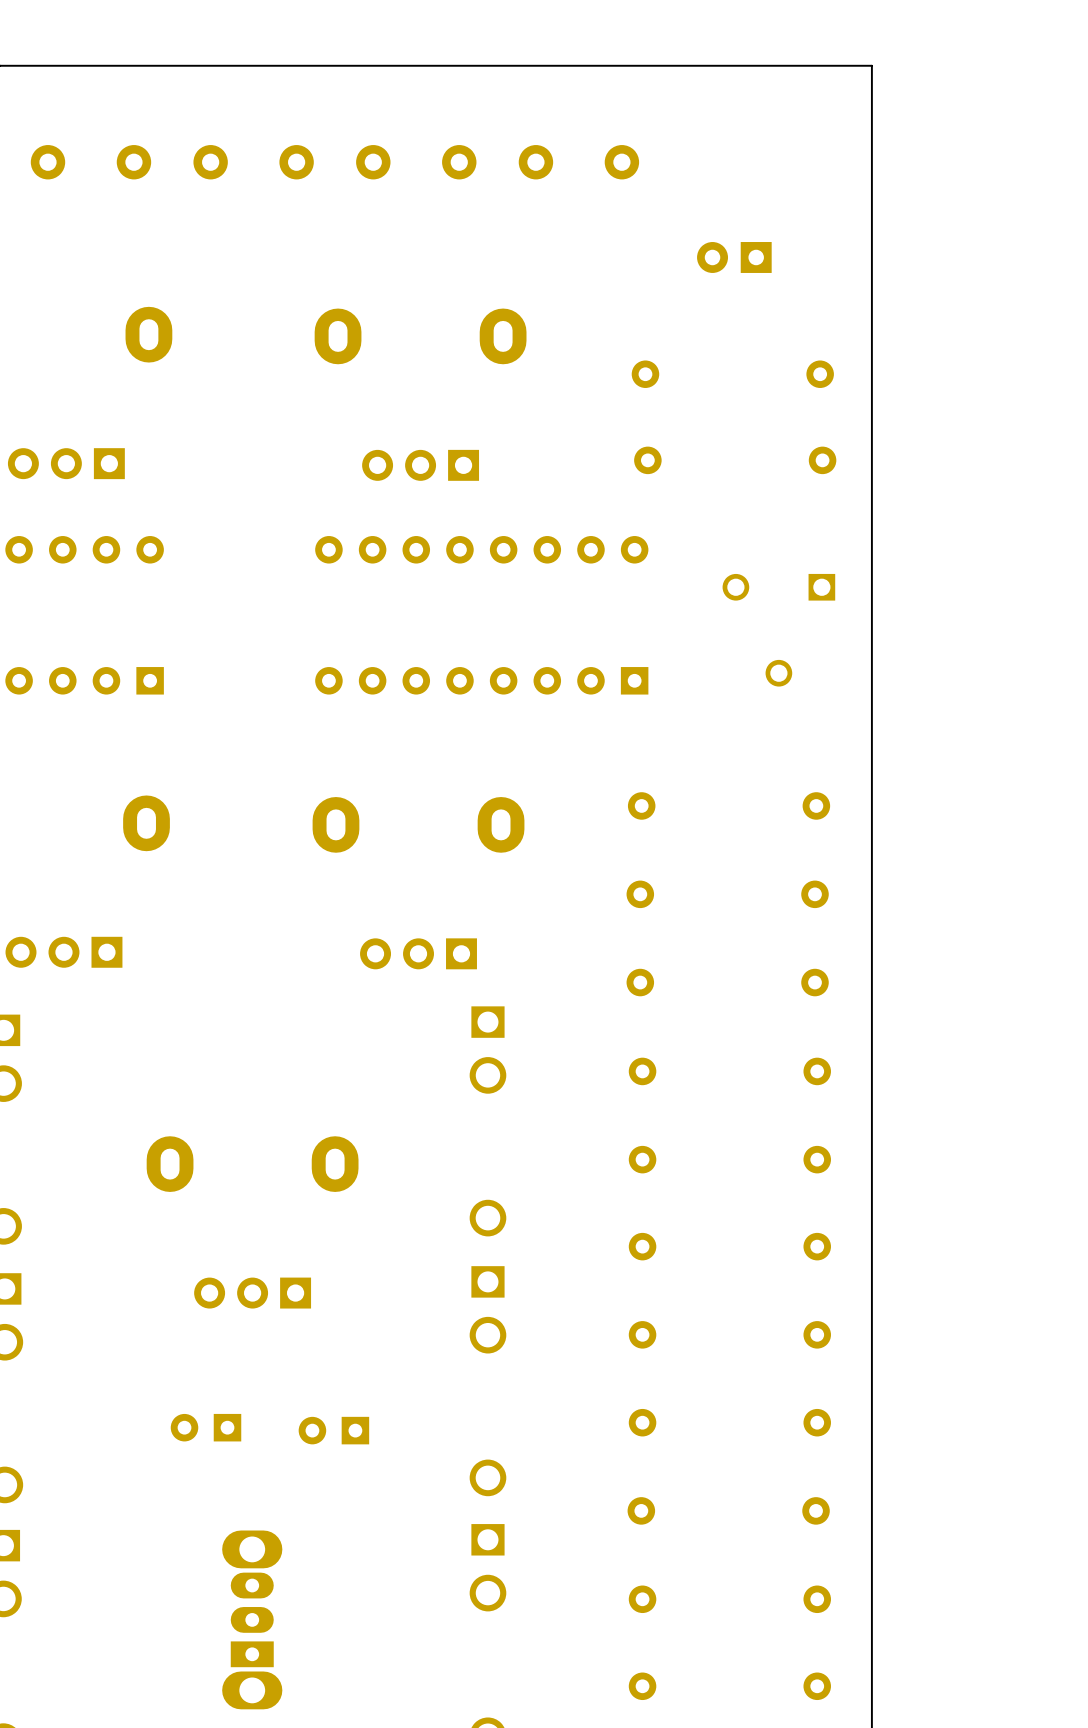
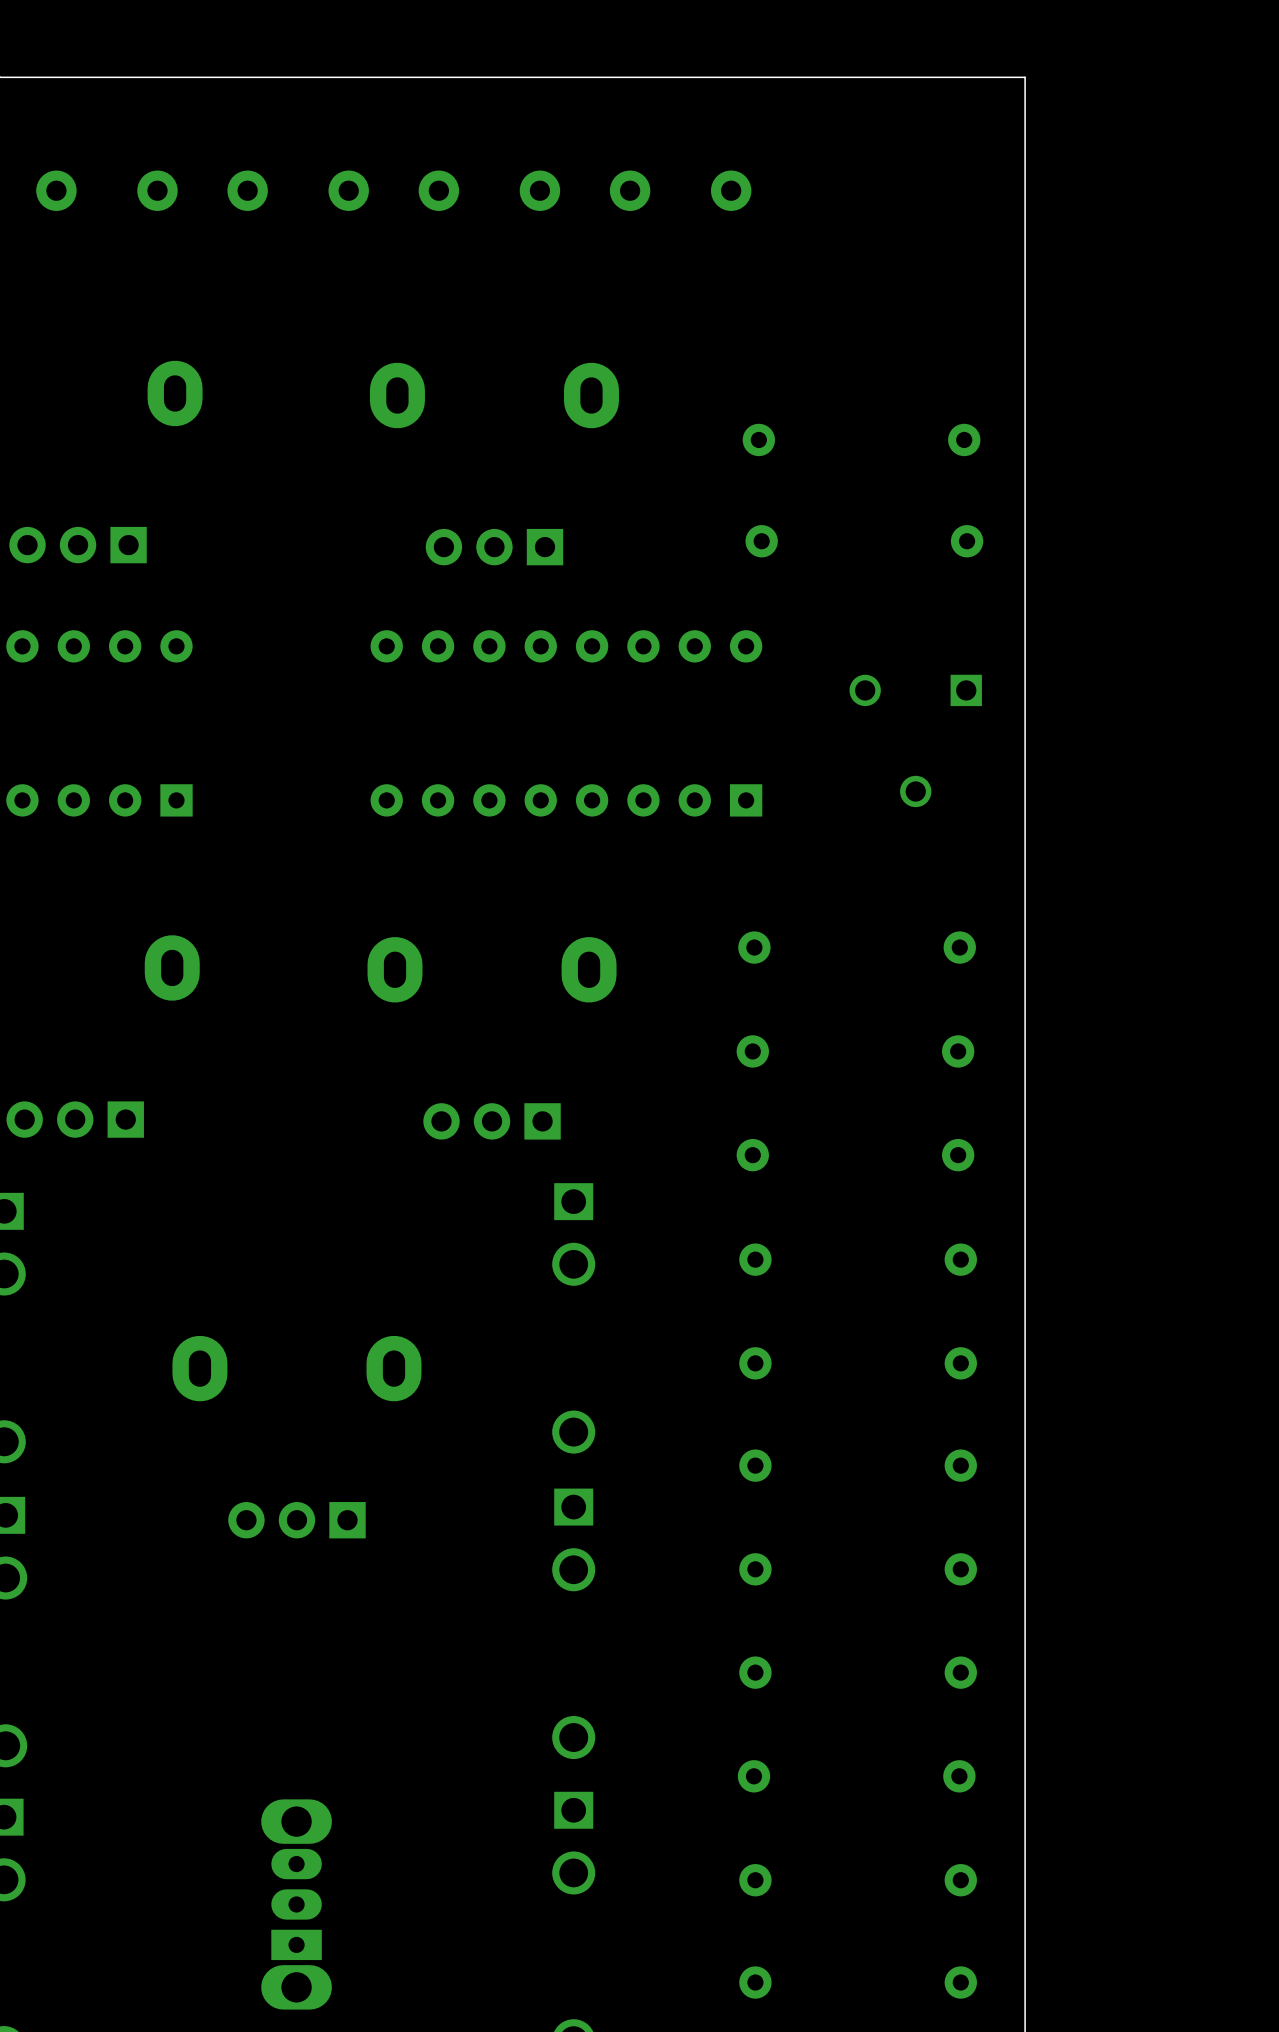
part: (734, 257) -> none
part: (206, 1427) -> none
part: (333, 1430) -> none

